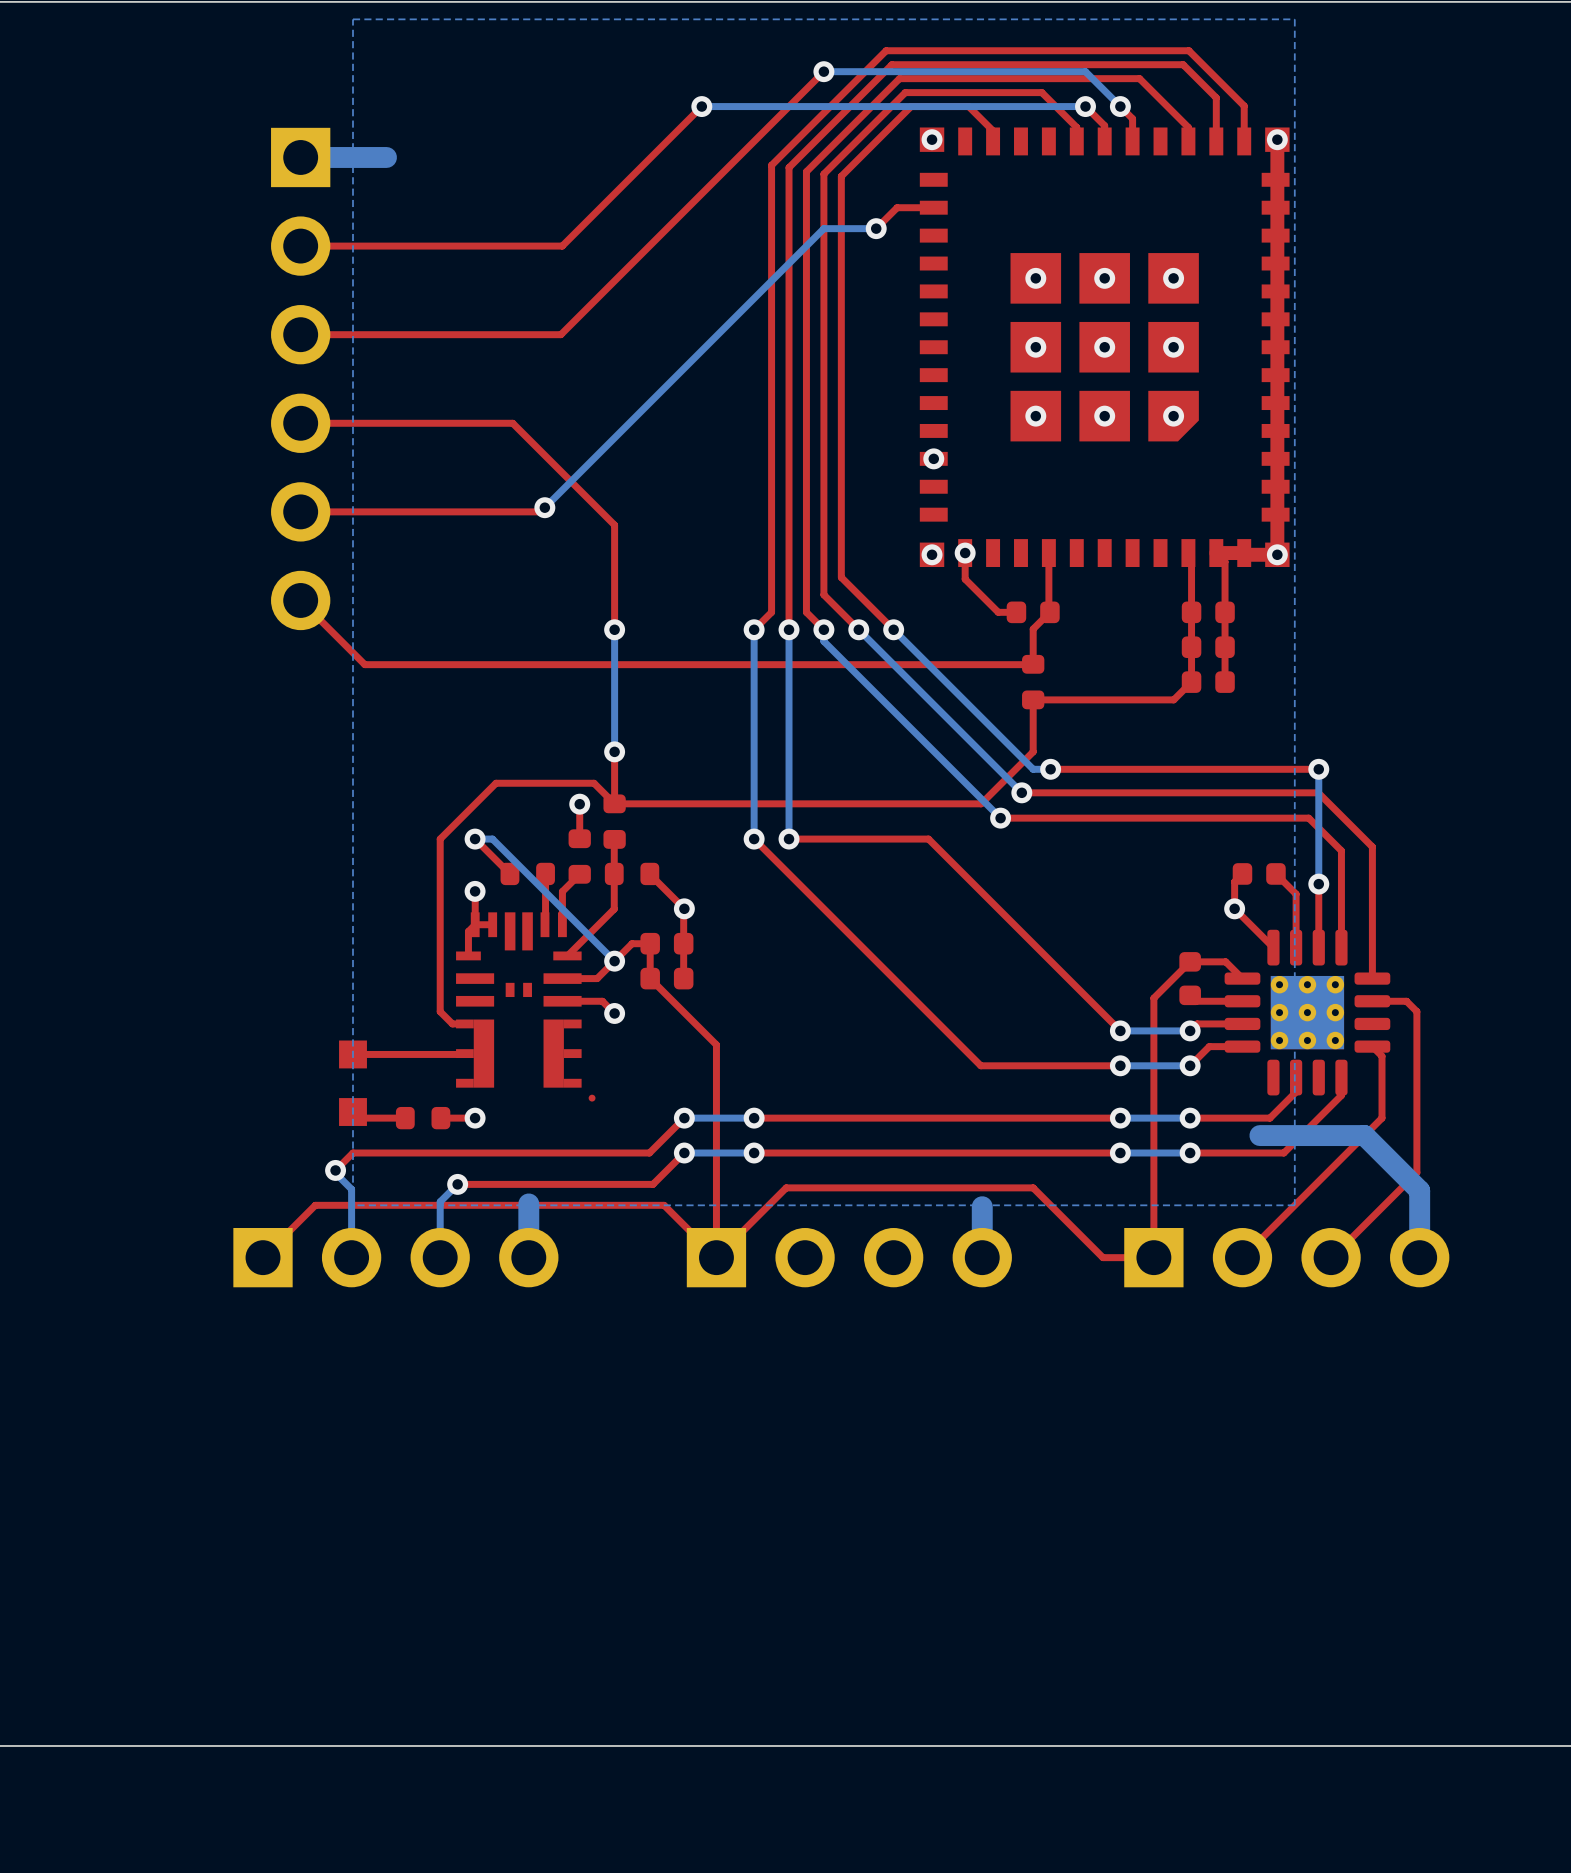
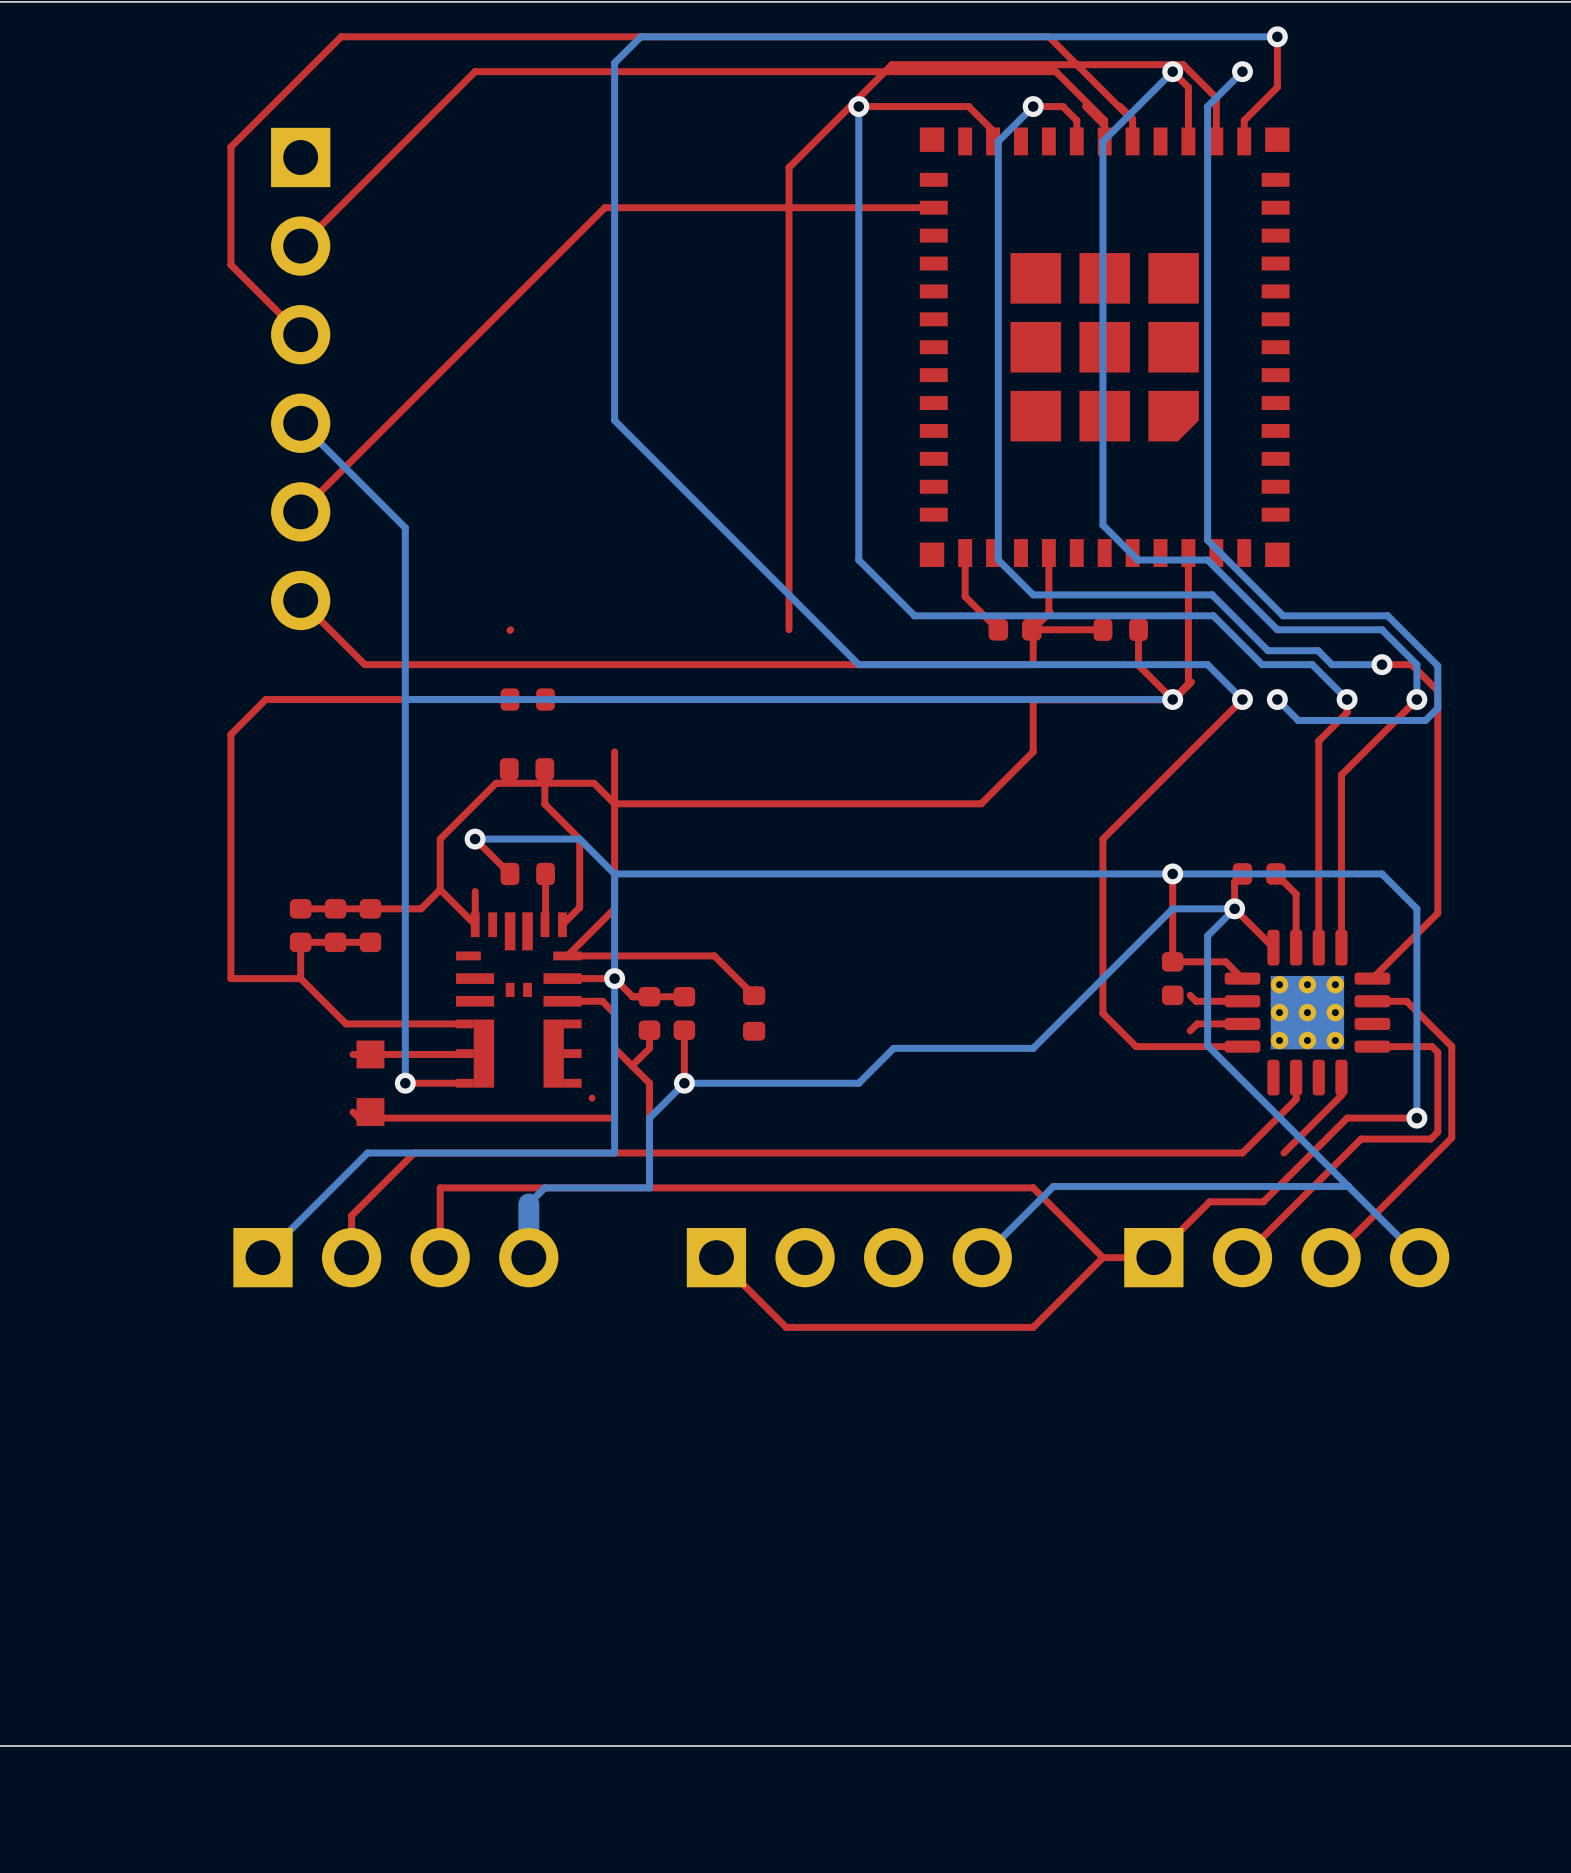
bottom zone outline: (1294, 19) (1294, 1205) (353, 1205) (353, 19) (1294, 19) -> none
bottom track: none -> (1277, 36) (640, 36) (614, 63) (614, 420) (858, 664) (1207, 664) (1242, 699)
via: none -> (1277, 36)
top track: (823, 71) (560, 334) (300, 334) -> (1132, 120) (1048, 36) (341, 36) (230, 147) (230, 264) (300, 334)
bottom track: (823, 71) (1085, 71) (1120, 106) -> none
via: (823, 71) -> none
bottom track: none -> (1172, 71) (1102, 141) (1102, 525) (1137, 560) (1207, 560) (1277, 629) (1382, 629) (1416, 664) (1416, 699)
via: none -> (1172, 71)
bottom track: none -> (1242, 71) (1207, 106) (1207, 540) (1283, 615) (1387, 615) (1437, 665) (1437, 708) (1425, 720) (1298, 720) (1277, 699)
via: none -> (1242, 71)
top track: (701, 106) (562, 246) (300, 246) -> (1104, 125) (1104, 120) (1055, 71) (475, 71) (300, 246)
via: (701, 106) -> none
bottom track: none -> (858, 106) (858, 560) (914, 615) (1213, 615) (1262, 664) (1312, 664) (1347, 699)
via: none -> (858, 106)
top track: (911, 106) (841, 176) (841, 577) (893, 629) -> (911, 106) (858, 106)
bottom track: none -> (1033, 106) (998, 141) (998, 560) (1033, 594) (1212, 594) (1267, 650) (1318, 650) (1331, 664) (1382, 664)
via: none -> (1033, 106)
bottom track: (1085, 106) (701, 106) -> none
via: (1085, 106) -> none
via: (1120, 106) -> none
top track: (1244, 120) (1244, 106) (1188, 50) (886, 50) (771, 165) (771, 612) (754, 629) -> (1244, 120) (1277, 87) (1277, 36)
top track: (1076, 127) (1041, 92) (905, 92) (823, 174) (823, 594) (858, 629) -> (1076, 127) (1076, 120) (1062, 106) (1033, 106)
top track: (1188, 127) (1139, 78) (899, 78) (806, 171) (806, 612) (823, 629) -> (1188, 127) (1188, 87) (1172, 71)
via: (932, 139) -> none
top track: (1277, 139) (1277, 554) (1216, 553) (1225, 561) (1225, 682) -> none
via: (1277, 139) -> none
bottom track: (300, 157) (387, 158) -> none
top track: (897, 207) (876, 228) -> none
bottom track: (876, 228) (823, 228) (544, 507) -> none
via: (876, 228) -> none
via: (1035, 278) -> none
via: (1104, 278) -> none
via: (1173, 278) -> none
via: (1035, 347) -> none
via: (1104, 347) -> none
via: (1173, 347) -> none
via: (1035, 416) -> none
via: (1104, 416) -> none
via: (1173, 416) -> none
top track: (300, 423) (512, 423) (614, 525) (614, 629) -> none
bottom track: none -> (300, 423) (405, 527) (405, 1083)
via: (933, 458) -> none
top track: (544, 507) (540, 511) (300, 511) -> (897, 207) (604, 207) (300, 511)
via: (544, 507) -> none
via: (965, 553) -> none
top track: (1188, 553) (1191, 556) (1191, 686) -> (1188, 553) (1188, 683) (1172, 699) (1138, 665) (1138, 629)
via: (932, 554) -> none
via: (1277, 554) -> none
top track: (965, 579) (998, 612) (1016, 612) -> (965, 579) (965, 596) (998, 629)
part position: (1033, 612) -> (1015, 629)
part: (1208, 612) -> none
top track: none -> (510, 629) (509, 630)
bottom track: (614, 629) (614, 751) -> none
via: (614, 629) -> none
bottom track: (754, 629) (754, 839) -> none
via: (754, 629) -> none
bottom track: (789, 629) (789, 839) -> none
via: (789, 629) -> none
bottom track: (823, 629) (823, 641) (1000, 818) -> none
via: (823, 629) -> none
bottom track: (858, 629) (1021, 792) -> none
via: (858, 629) -> none
bottom track: (893, 629) (1033, 769) (1050, 769) -> none
via: (893, 629) -> none
top track: none -> (1102, 629) (1031, 629)
part: (1208, 647) -> none
via: none -> (1382, 664)
part rotation: 0° (1033, 682) -> 90° clockwise (1120, 629)
part position: (1033, 682) -> (1120, 629)
part: (1208, 682) -> none
top track: none -> (509, 699) (265, 699) (230, 734) (230, 978) (300, 978)
part: none -> (527, 699)
bottom track: none -> (1172, 699) (405, 699)
via: none -> (1172, 699)
via: none -> (1242, 699)
via: none -> (1277, 699)
top track: none -> (1347, 699) (1347, 712) (1318, 740) (1318, 884)
via: none -> (1347, 699)
via: none -> (1416, 699)
via: (614, 751) -> none
part: none -> (527, 769)
via: (1050, 769) -> none
top track: (1318, 769) (1050, 769) -> none
bottom track: (1318, 769) (1318, 884) -> none
via: (1318, 769) -> none
top track: (1021, 792) (1318, 792) (1372, 846) (1372, 978) -> (1382, 664) (1411, 664) (1437, 690) (1437, 913) (1372, 978)
via: (1021, 792) -> none
top track: (579, 804) (579, 838) -> none
via: (579, 804) -> none
top track: (1000, 818) (1308, 818) (1341, 850) -> (1416, 699) (1341, 774) (1341, 850)
via: (1000, 818) -> none
part: (614, 821) -> none
bottom track: (492, 839) (614, 961) -> (492, 839) (579, 839) (614, 873)
top track: (614, 839) (614, 909) -> (614, 803) (614, 908)
top track: (754, 839) (980, 1065) (1120, 1065) -> none
via: (754, 839) -> none
top track: (789, 839) (928, 839) (1102, 1013) -> (1242, 699) (1102, 839) (1102, 1013)
via: (789, 839) -> none
part: (579, 856) -> none
bottom track: none -> (614, 873) (614, 1153) (367, 1153) (263, 1257)
bottom track: none -> (614, 873) (1382, 873) (1416, 908) (1416, 1118)
part: (632, 873) -> none
top track: none -> (1172, 873) (1172, 961) (1190, 961)
via: none -> (1172, 873)
top track: (579, 874) (562, 891) (562, 924) -> (544, 769) (544, 804) (579, 839) (579, 907) (562, 924)
top track: (649, 874) (684, 908) (683, 978) -> none
via: (1318, 884) -> none
top track: (440, 889) (440, 1011) (452, 1023) -> (300, 978) (346, 1023) (452, 1023)
via: (475, 891) -> none
top track: none -> (300, 908) (421, 908) (440, 889) (475, 924)
via: (684, 908) -> none
top track: (492, 924) (475, 924) (468, 931) (468, 955) -> none
part: none -> (300, 925)
part: none -> (335, 925)
part: none -> (370, 925)
top track: none -> (374, 942) (300, 942) (300, 978)
part: (666, 943) -> none
top track: none -> (567, 955) (714, 955) (754, 995)
via position: (614, 961) -> (614, 978)
top track: (1190, 961) (1153, 998) (1153, 1257) -> (1416, 1118) (1347, 1118) (1263, 1201) (1209, 1201) (1153, 1257)
top track: (597, 978) (632, 943) (650, 943) (650, 978) (716, 1044) (716, 1257) -> (597, 978) (614, 978) (632, 996) (684, 996)
part: (666, 978) -> none
part position: (1190, 978) -> (1172, 978)
top track: (1416, 1011) (1416, 1172) -> (1416, 1011) (1451, 1046) (1451, 1137) (1416, 1172)
top track: none -> (614, 1013) (614, 1048) (649, 1083) (649, 1118)
via: (614, 1013) -> none
part: none -> (649, 1013)
part: none -> (684, 1013)
part: none -> (754, 1013)
top track: none -> (649, 1030) (649, 1048) (632, 1065)
top track: none -> (684, 1030) (684, 1083)
via: (1120, 1030) -> none
bottom track: (1190, 1030) (1120, 1030) -> none
via: (1190, 1030) -> none
top track: (1209, 1046) (1190, 1065) -> (1209, 1046) (1136, 1046) (1120, 1030)
top track: (1372, 1046) (1382, 1056) (1382, 1118) (1361, 1139) -> (1372, 1046) (1432, 1046) (1437, 1052) (1437, 1132) (1430, 1139) (1361, 1139)
via: (1120, 1065) -> none
bottom track: (1190, 1065) (1120, 1065) -> none
via: (1190, 1065) -> none
part position: (353, 1083) -> (370, 1083)
via: none -> (405, 1083)
top track: none -> (463, 1083) (405, 1083)
via: none -> (684, 1083)
top track: (1296, 1091) (1269, 1118) (1190, 1118) -> none
part: (423, 1118) -> none
top track: none -> (440, 1118) (405, 1118)
via: (475, 1118) -> none
top track: none -> (613, 1118) (475, 1118)
top track: (684, 1118) (649, 1153) -> (754, 1153) (649, 1153)
via: (684, 1118) -> none
bottom track: (754, 1118) (684, 1118) -> none
via: (754, 1118) -> none
top track: (1120, 1118) (754, 1118) -> none
via: (1120, 1118) -> none
bottom track: (1190, 1118) (1120, 1118) -> none
via: (1190, 1118) -> none
via: none -> (1416, 1118)
bottom track: (1294, 1135) (1259, 1135) (1364, 1135) (1419, 1190) (1419, 1257) -> (528, 1203) (544, 1187) (649, 1187) (649, 1118) (684, 1083) (858, 1083) (893, 1048) (1033, 1048) (1172, 908) (1234, 908) (1207, 935) (1207, 1045) (1419, 1257)
top track: (414, 1153) (353, 1153) (335, 1170) -> (414, 1153) (351, 1215) (351, 1257)
top track: (684, 1153) (652, 1184) (457, 1184) -> none
via: (684, 1153) -> none
bottom track: (754, 1153) (684, 1153) -> none
via: (754, 1153) -> none
via: (1120, 1153) -> none
top track: none -> (1190, 1153) (1120, 1153)
bottom track: (1190, 1153) (1120, 1153) -> none
via: (1190, 1153) -> none
top track: (1283, 1153) (1242, 1153) -> (1296, 1091) (1296, 1099) (1242, 1153)
bottom track: (335, 1170) (335, 1173) (351, 1189) (351, 1257) -> none
via: (335, 1170) -> none
bottom track: (457, 1184) (440, 1201) (440, 1257) -> none
via: (457, 1184) -> none
top track: (786, 1187) (716, 1257) -> (786, 1187) (440, 1187) (440, 1257)
bottom track: (980, 1205) (982, 1257) -> (1348, 1186) (1053, 1186) (982, 1257)
top track: (716, 1257) (664, 1205) (315, 1205) (263, 1257) -> (716, 1257) (786, 1327) (1033, 1327) (1102, 1257)

